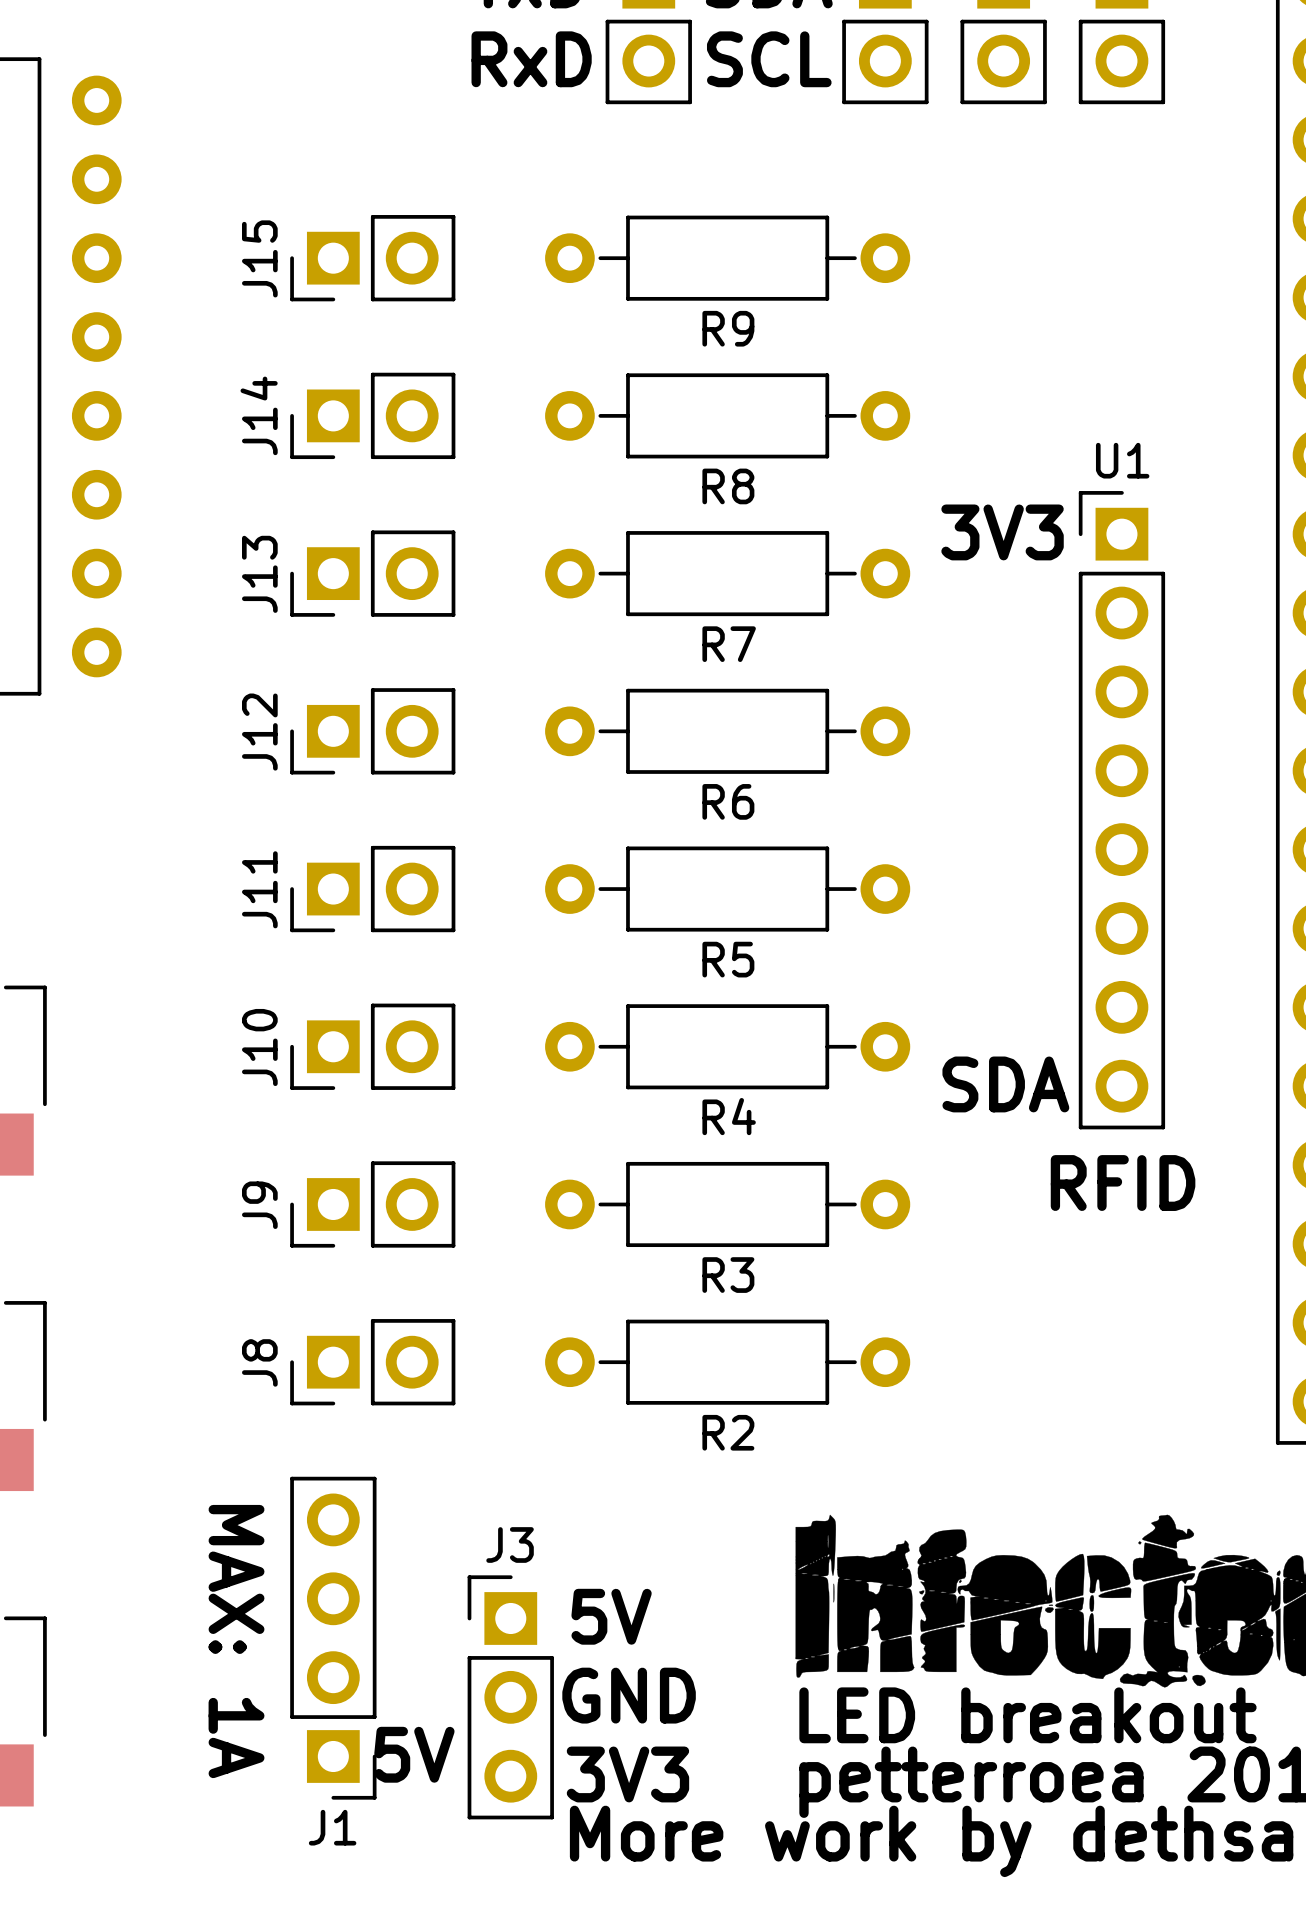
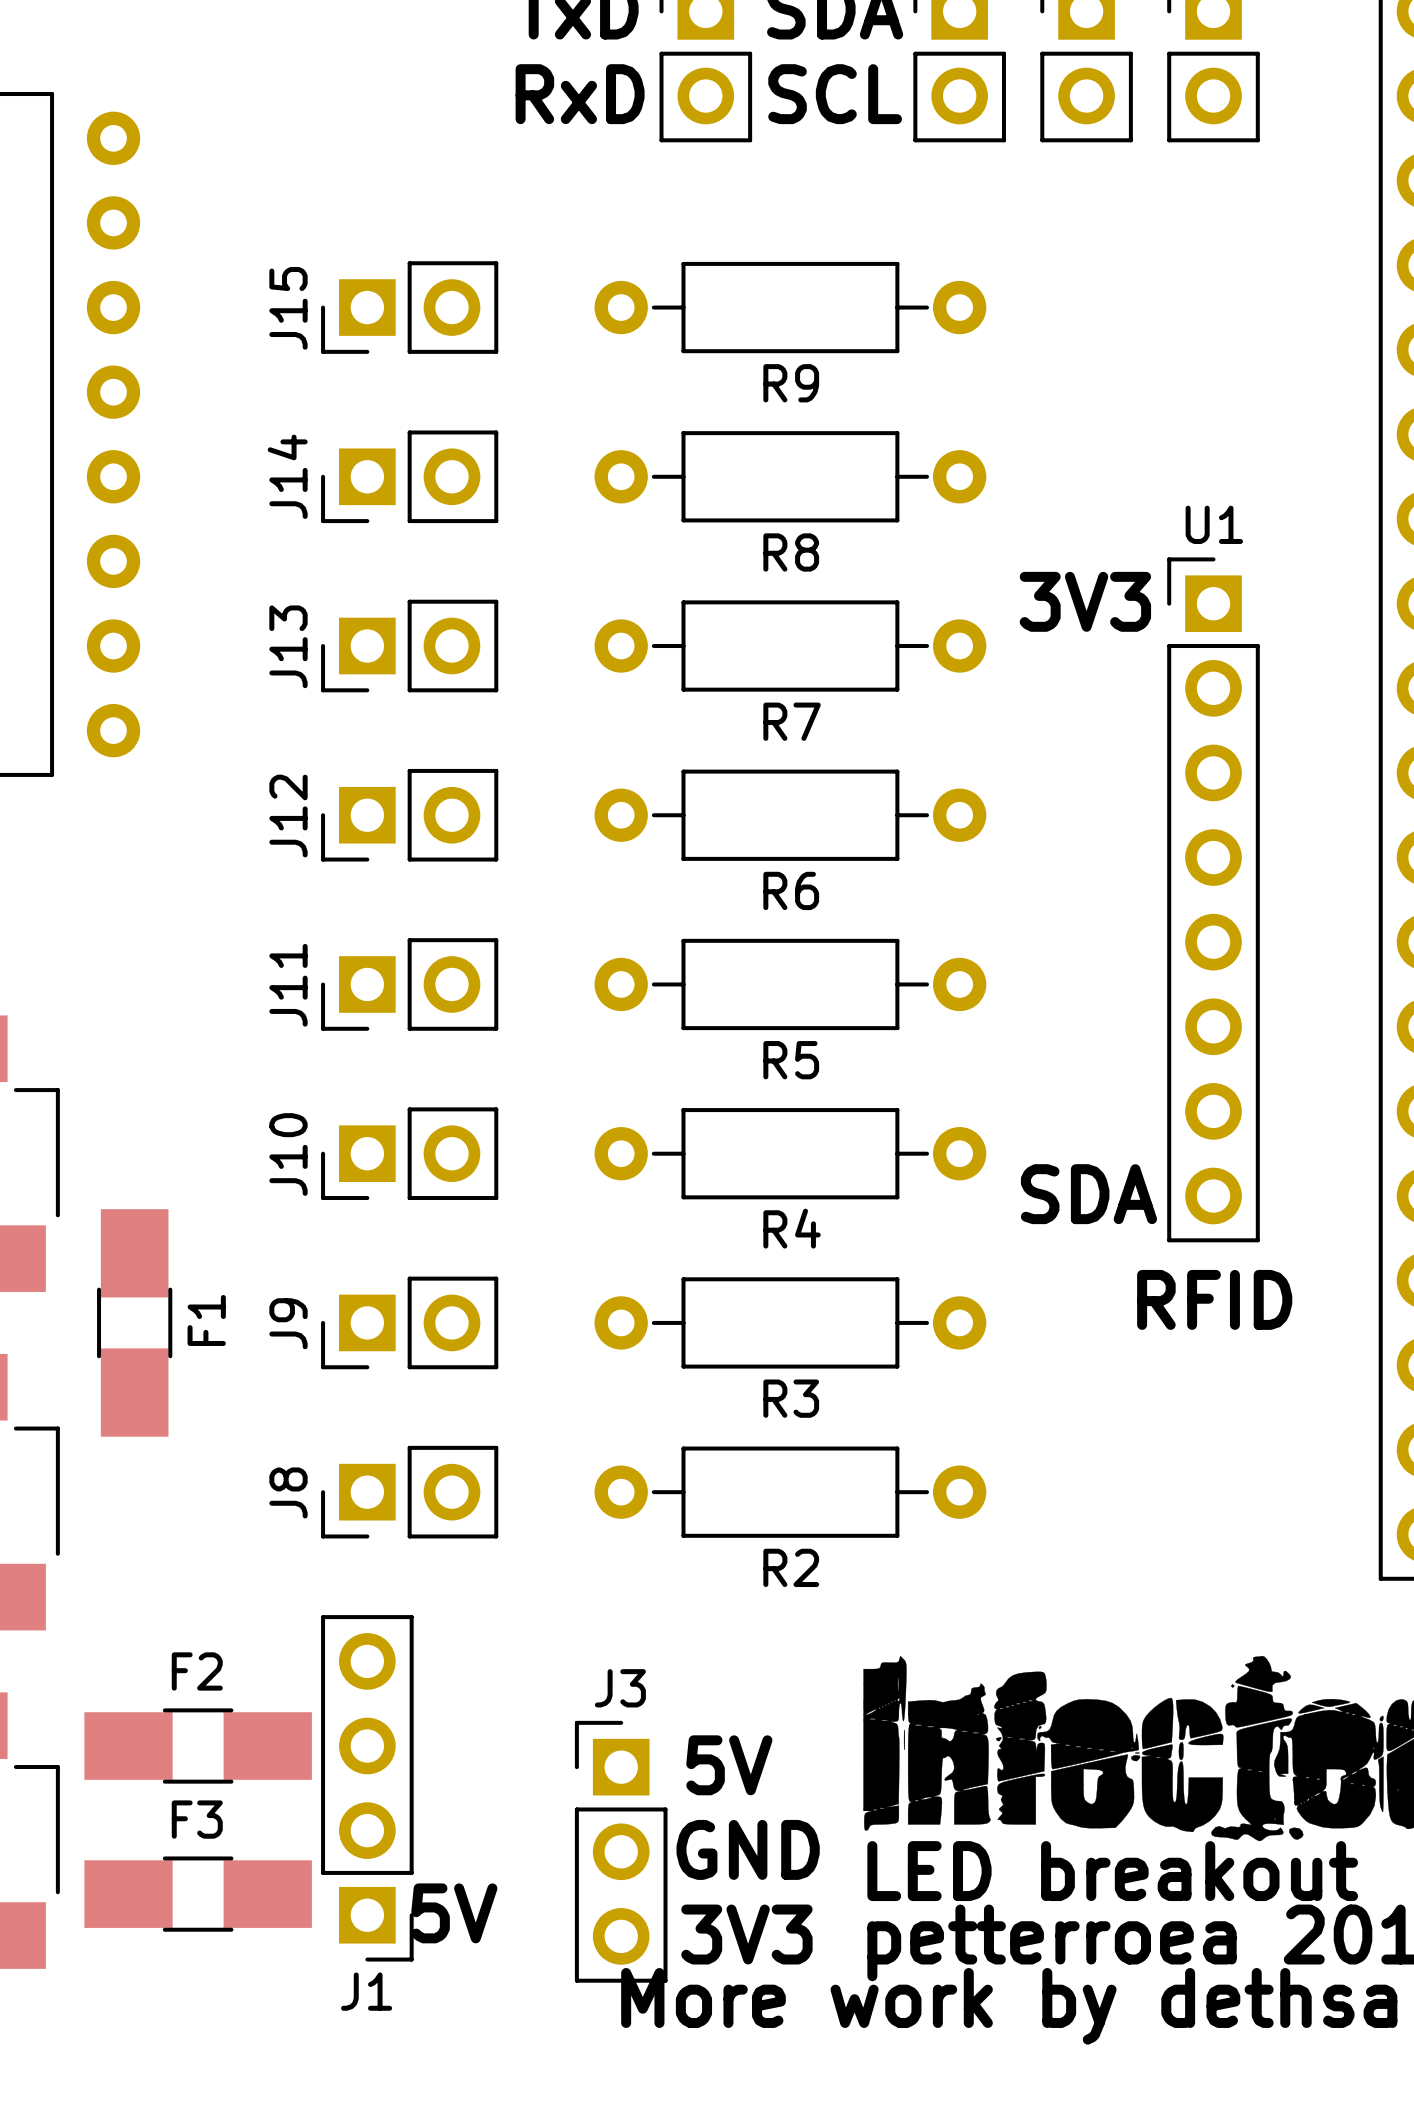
F1: none -> (134, 1322)
F2: none -> (198, 1746)
text position: 5V (611, 1616) -> 5V (729, 1765)
text: MAX: 1A (236, 1641) -> none
text position: GND (629, 1695) -> GND (748, 1849)
J3 position: (510, 1697) -> (621, 1851)
F3: none -> (198, 1894)
text position: 3V3 (627, 1774) -> 3V3 (746, 1934)

